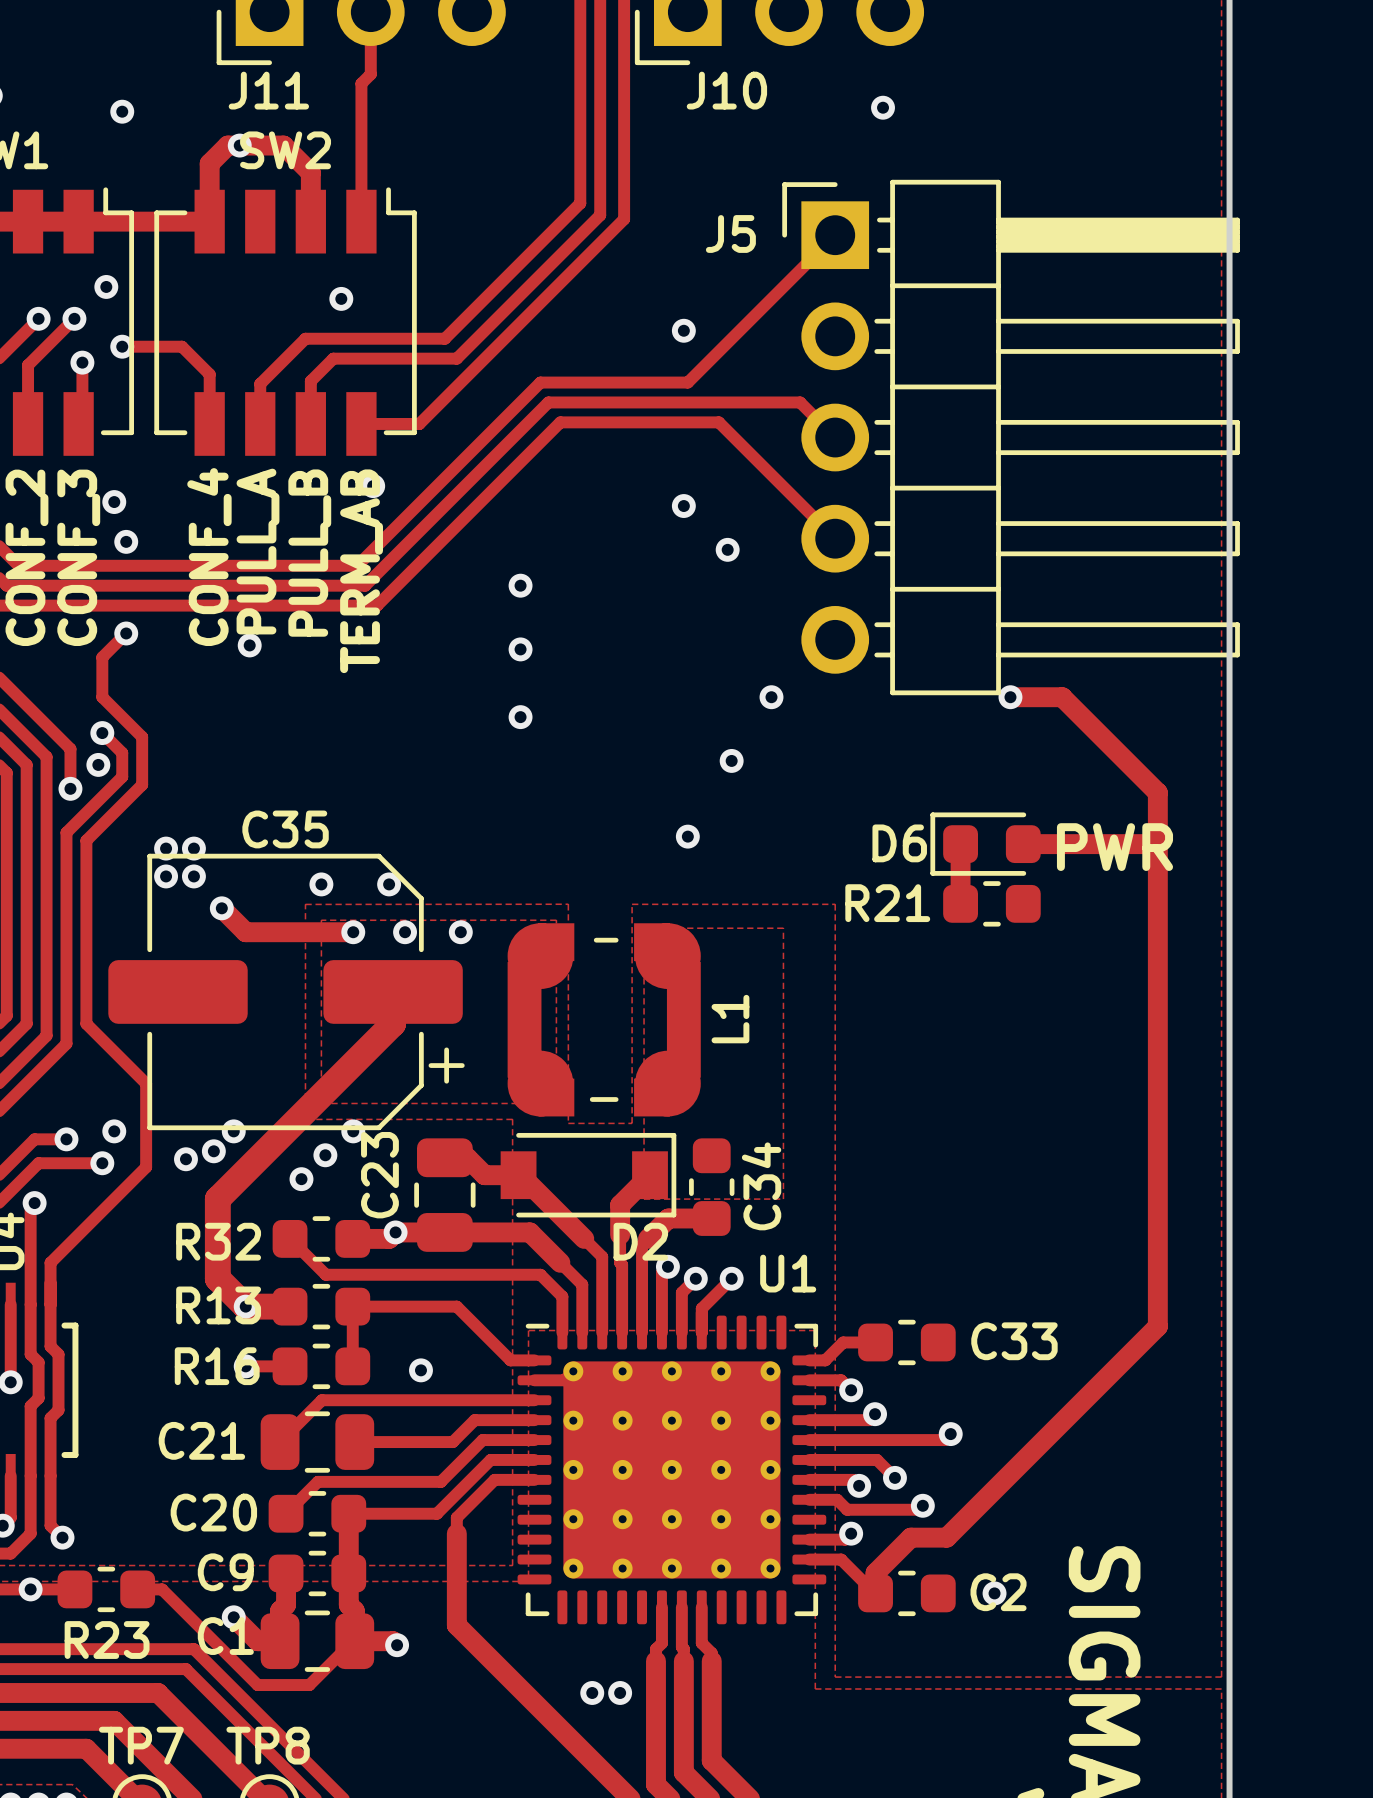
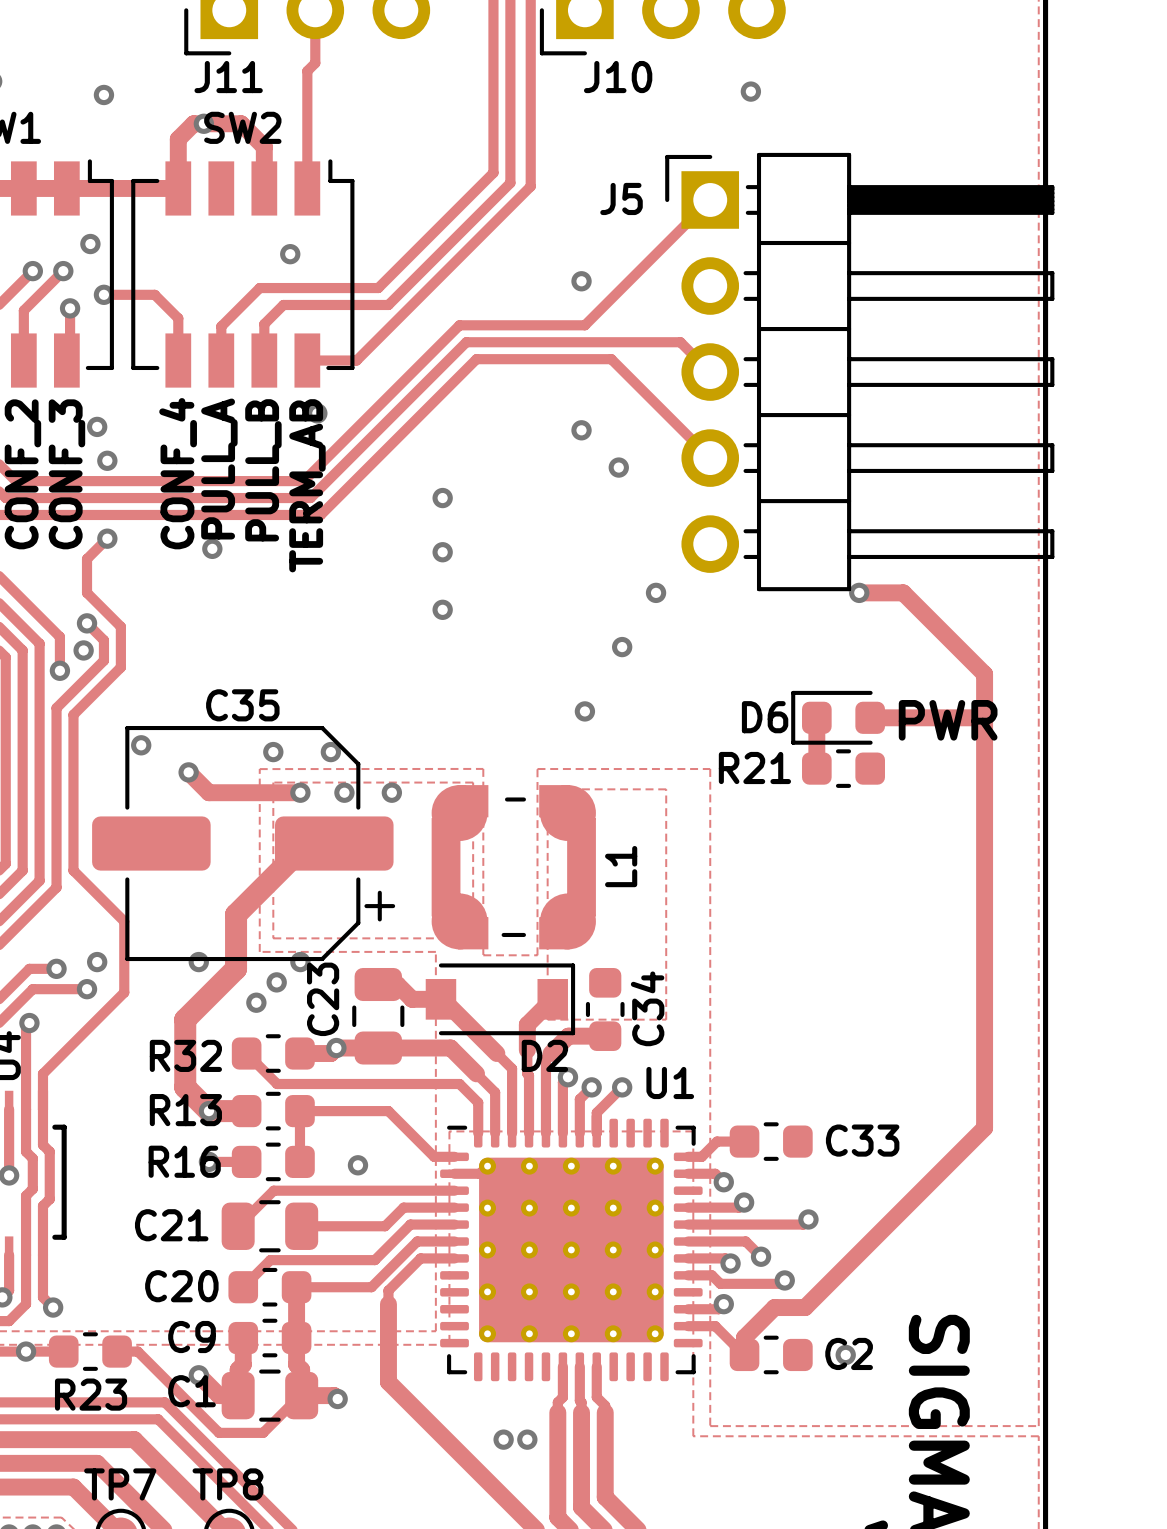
via: (166, 848) -> none
via: (193, 848) -> none
via: (193, 876) -> none
track: (393, 991) (393, 1023) (277, 1139) -> (334, 843) (307, 843) (236, 914) (236, 968)
via: (213, 1151) -> none
via: (185, 1159) -> none

